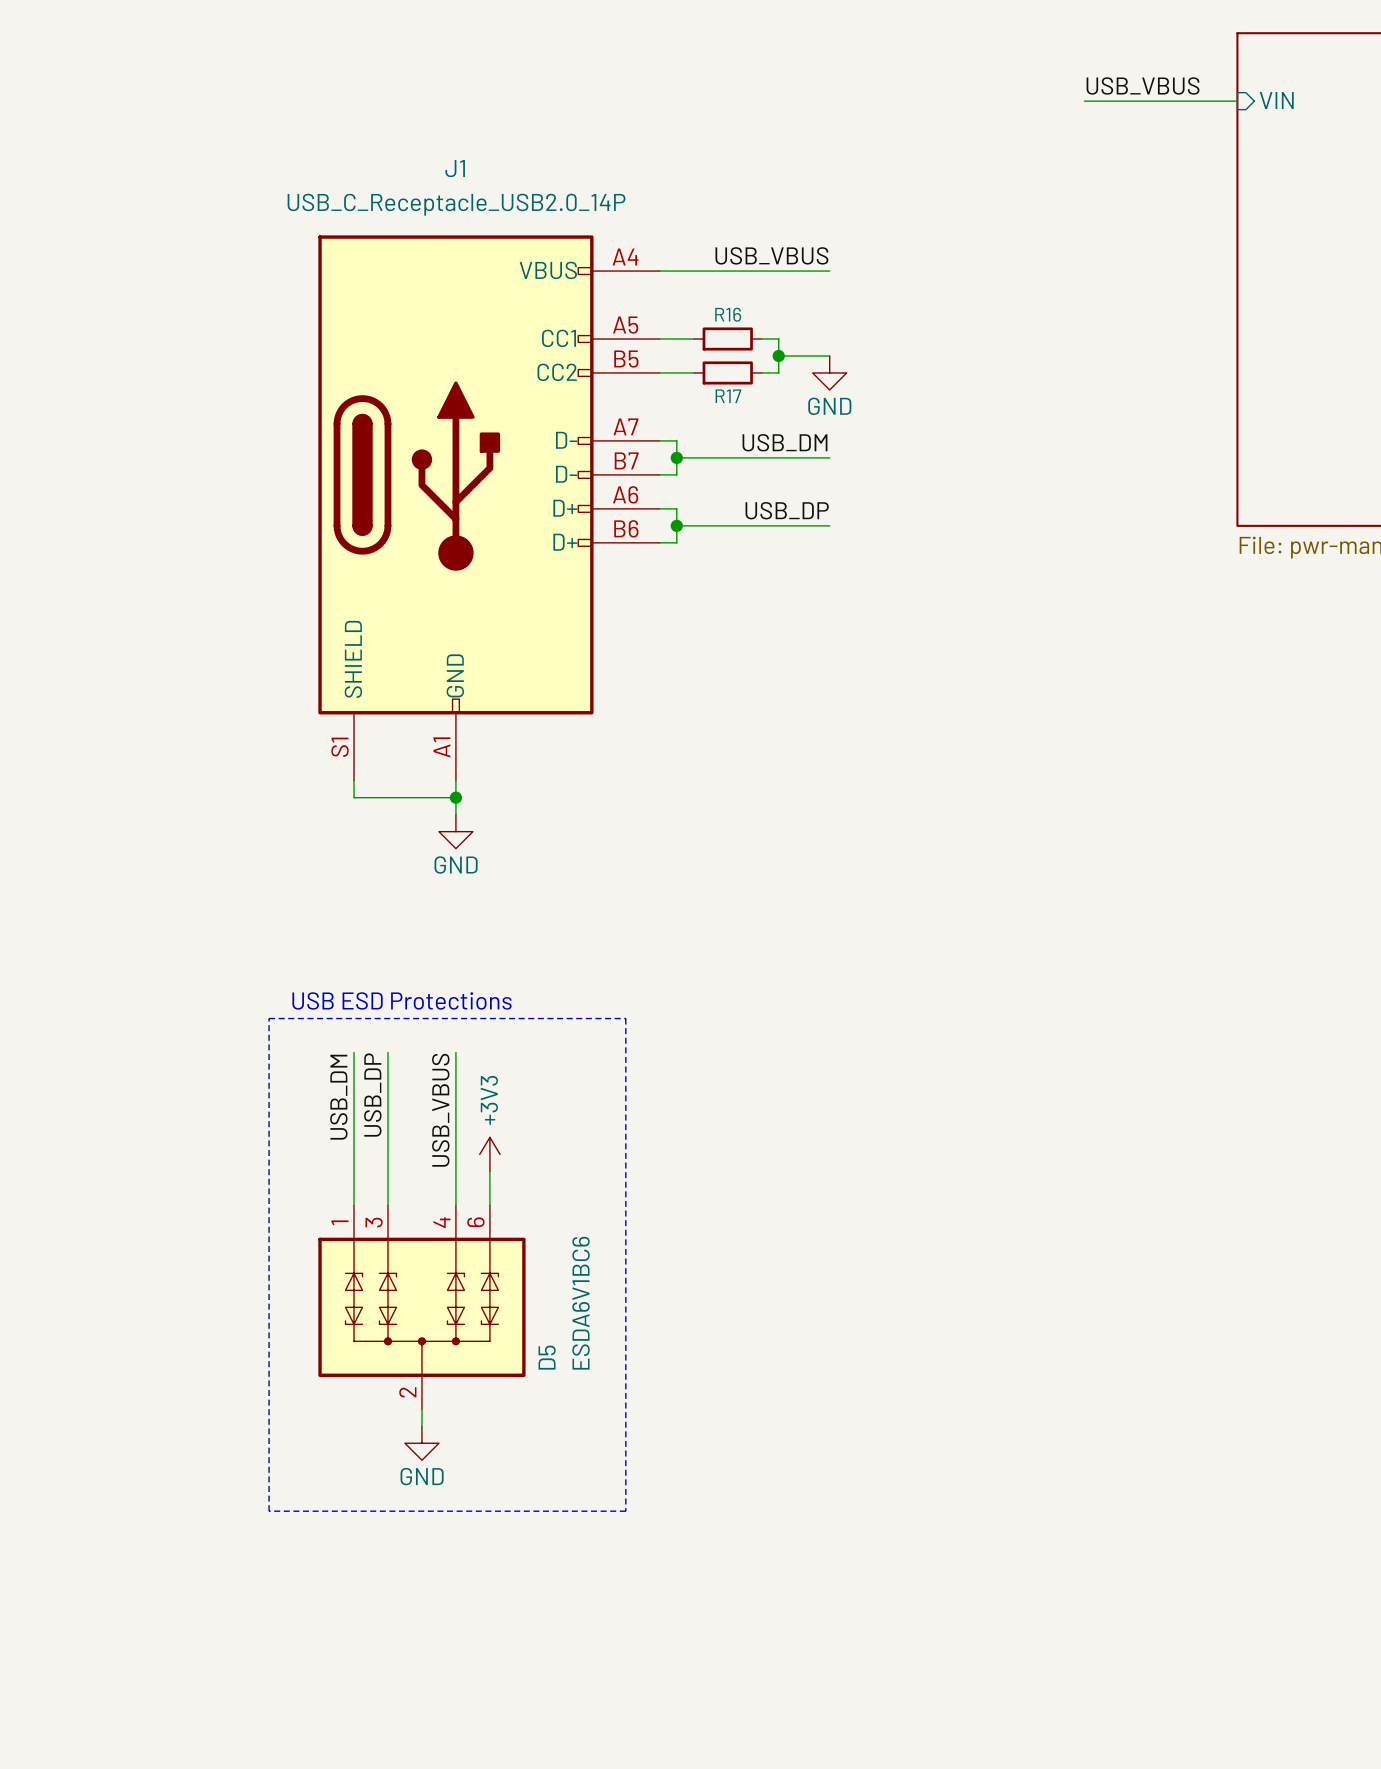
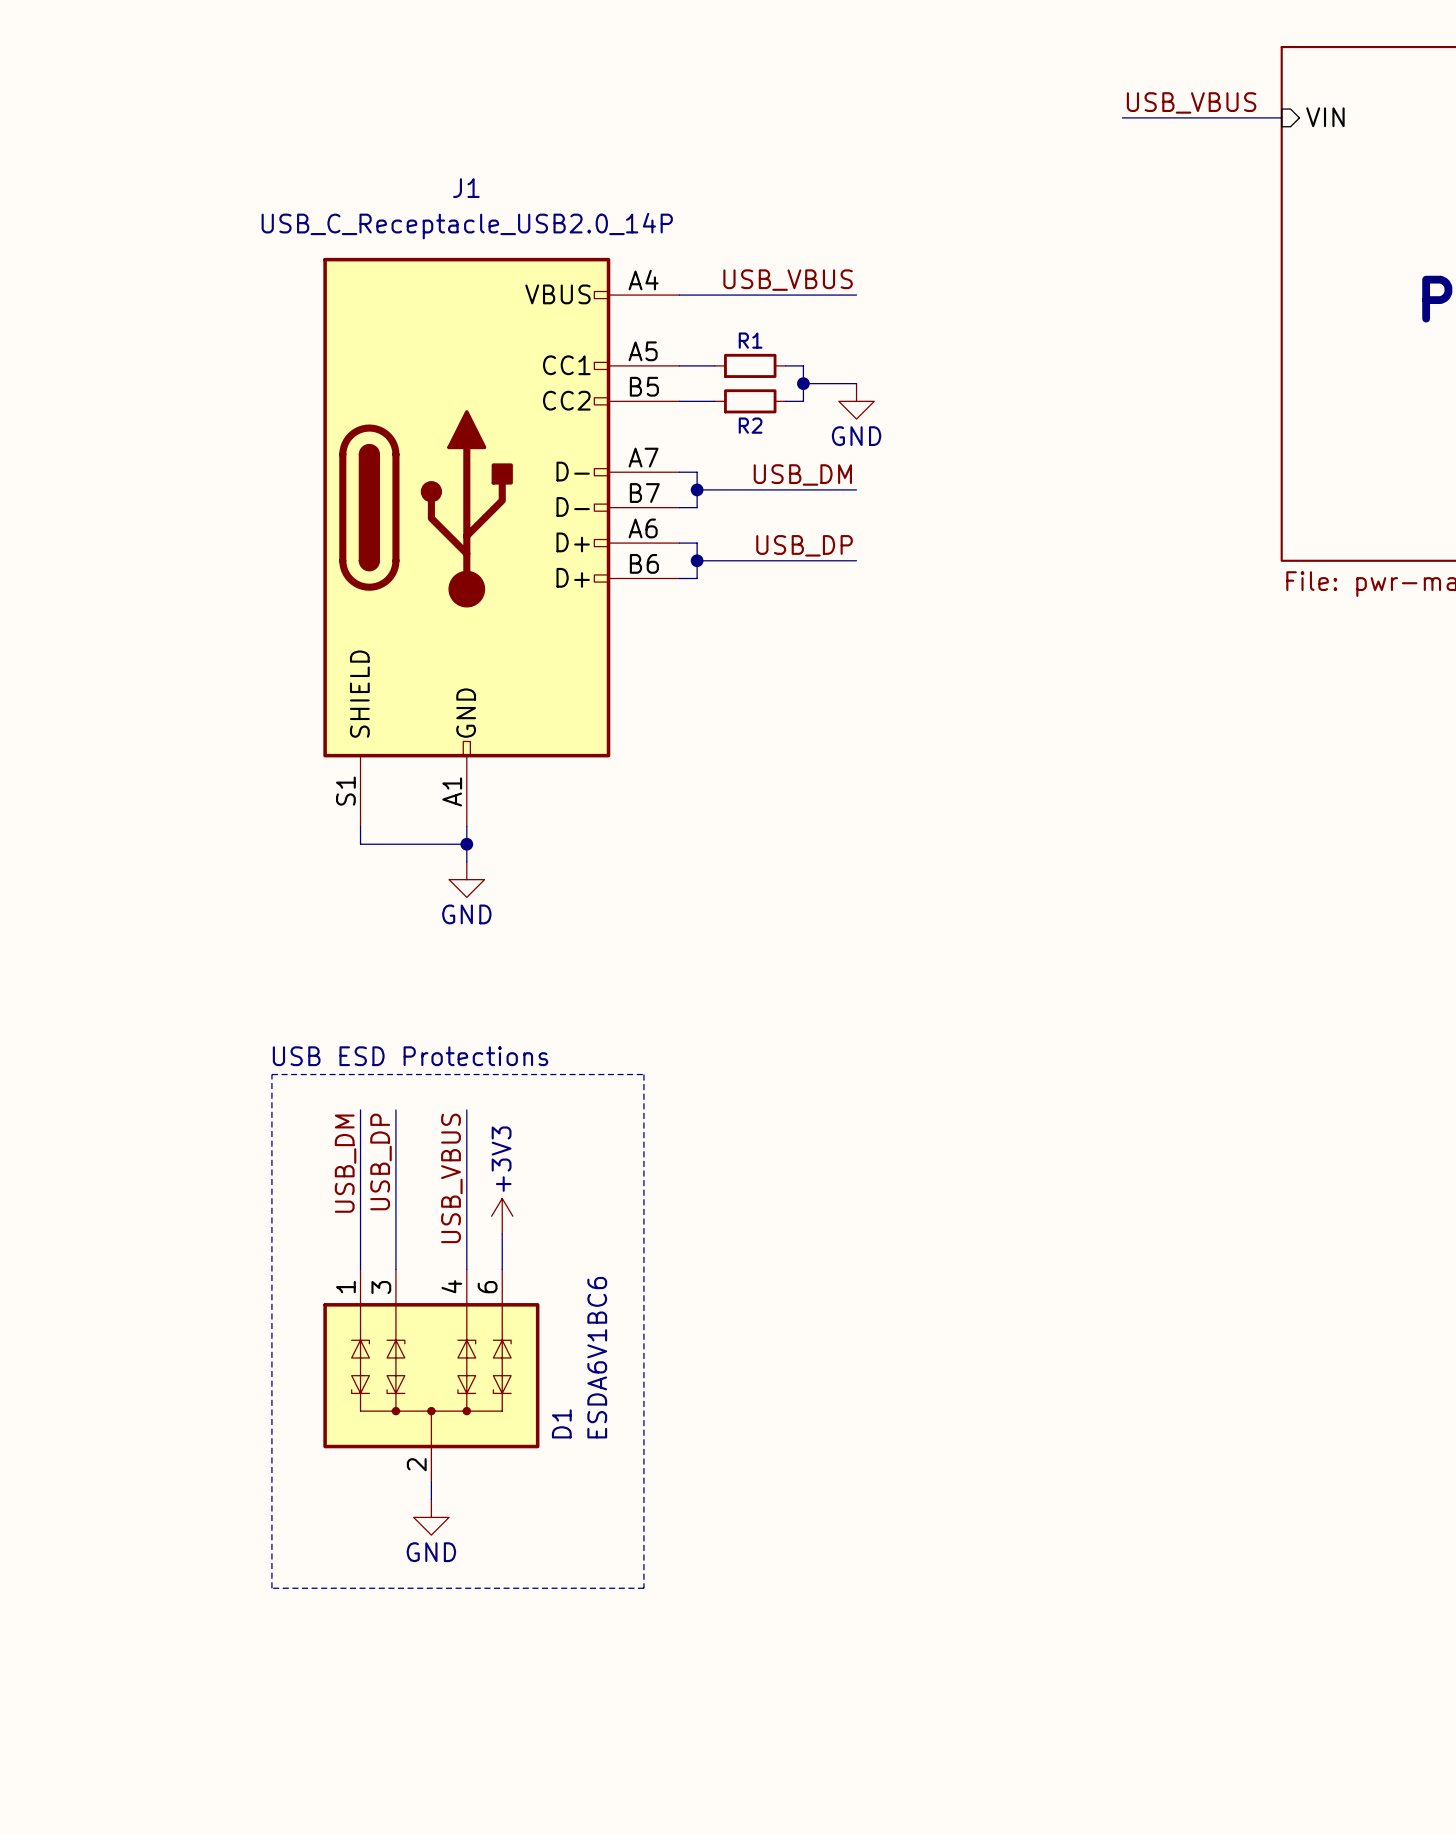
R16 name: R16 (728, 314) -> R1 (750, 340)
R17 name: R17 (728, 396) -> R2 (750, 425)
D5 name: D5 (547, 1357) -> D1 (561, 1423)

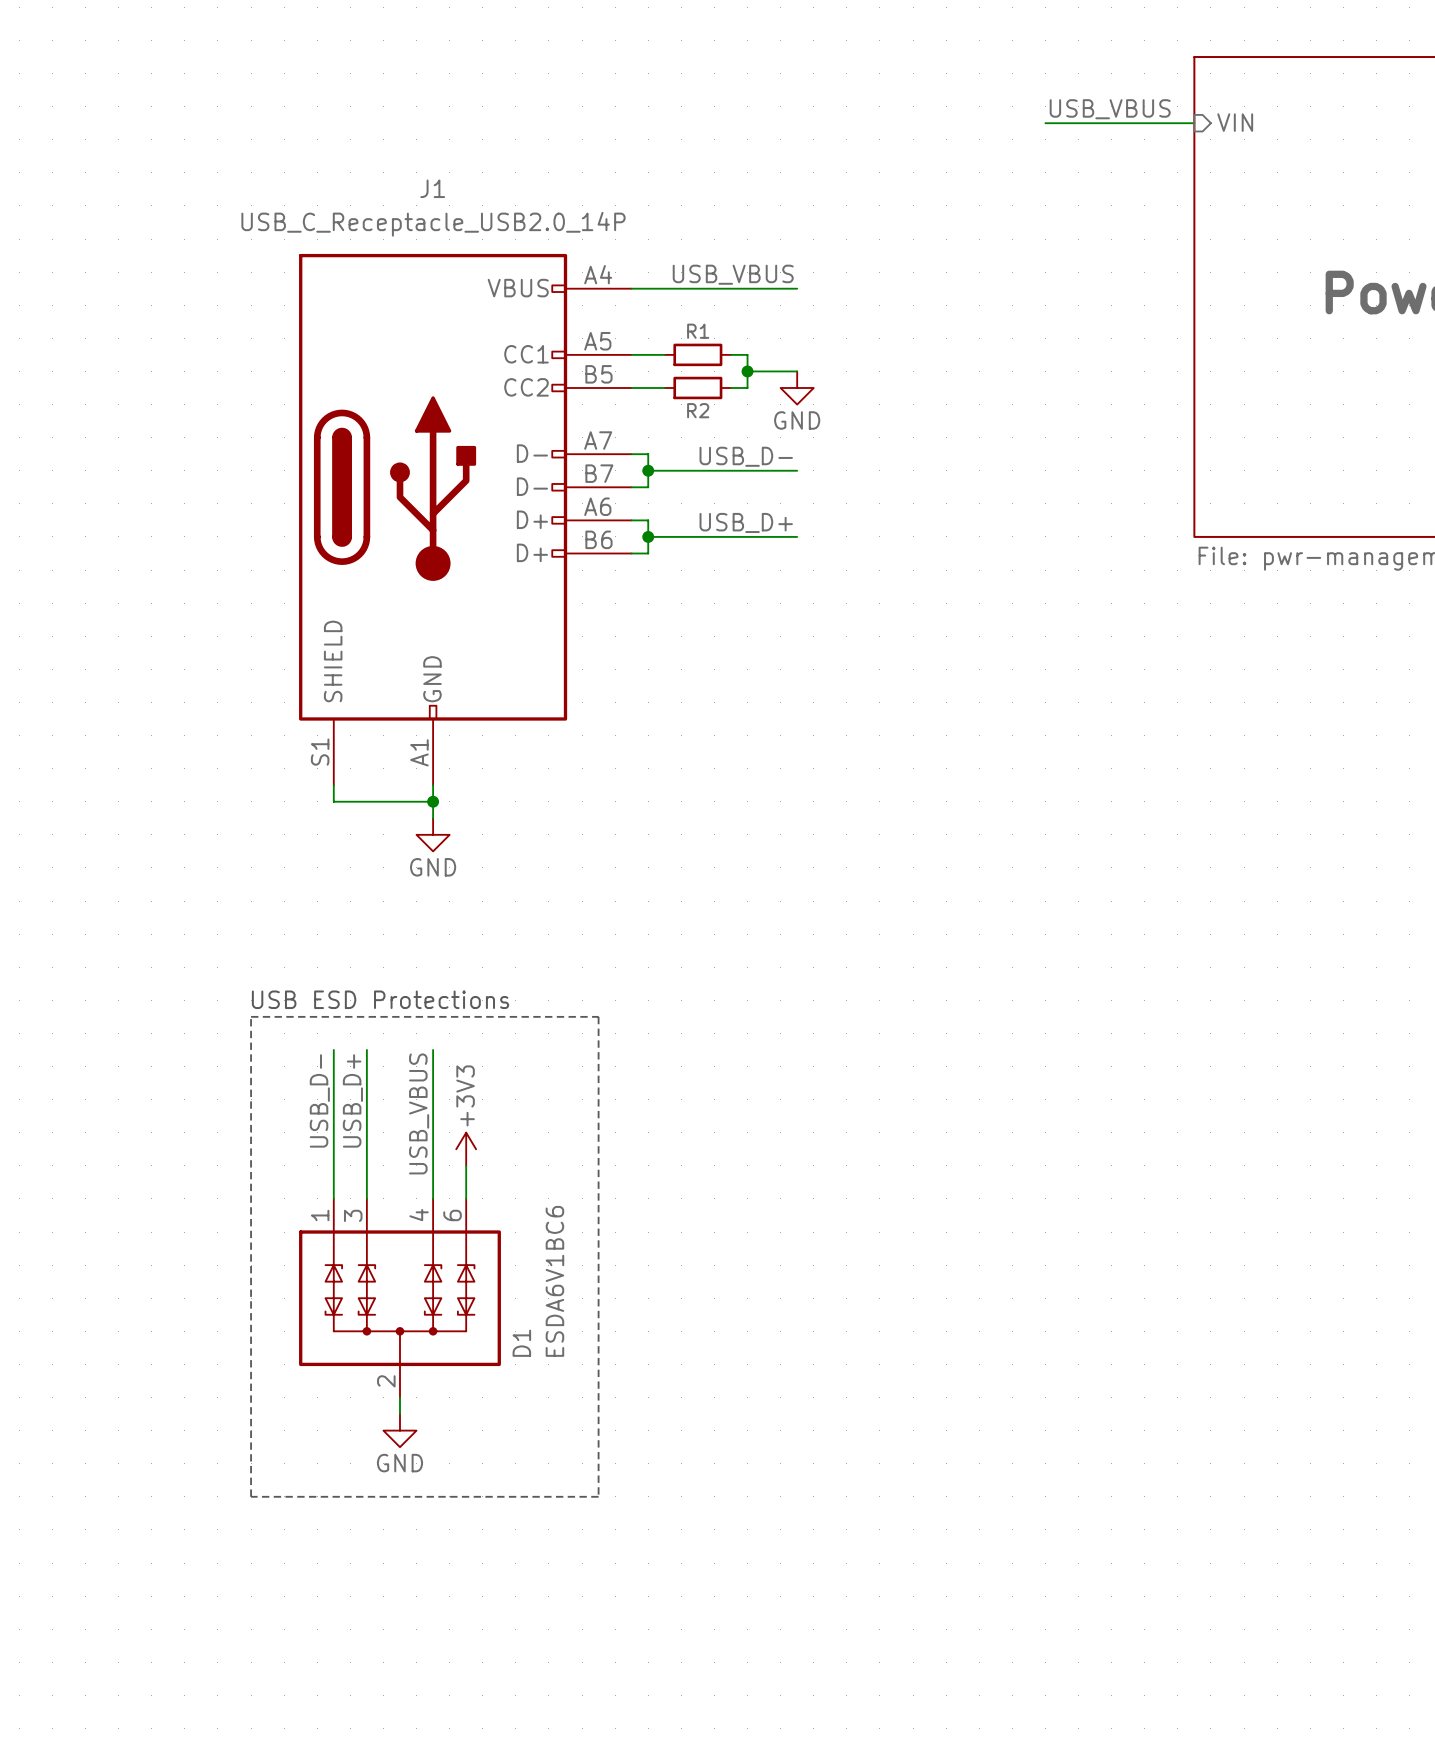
label: USB_DM (802, 474) -> USB_D- (746, 456)
label: USB_DP (804, 545) -> USB_D+ (746, 522)
label: USB_DP (380, 1161) -> USB_D+ (352, 1100)
label: USB_DM (345, 1163) -> USB_D- (319, 1100)

